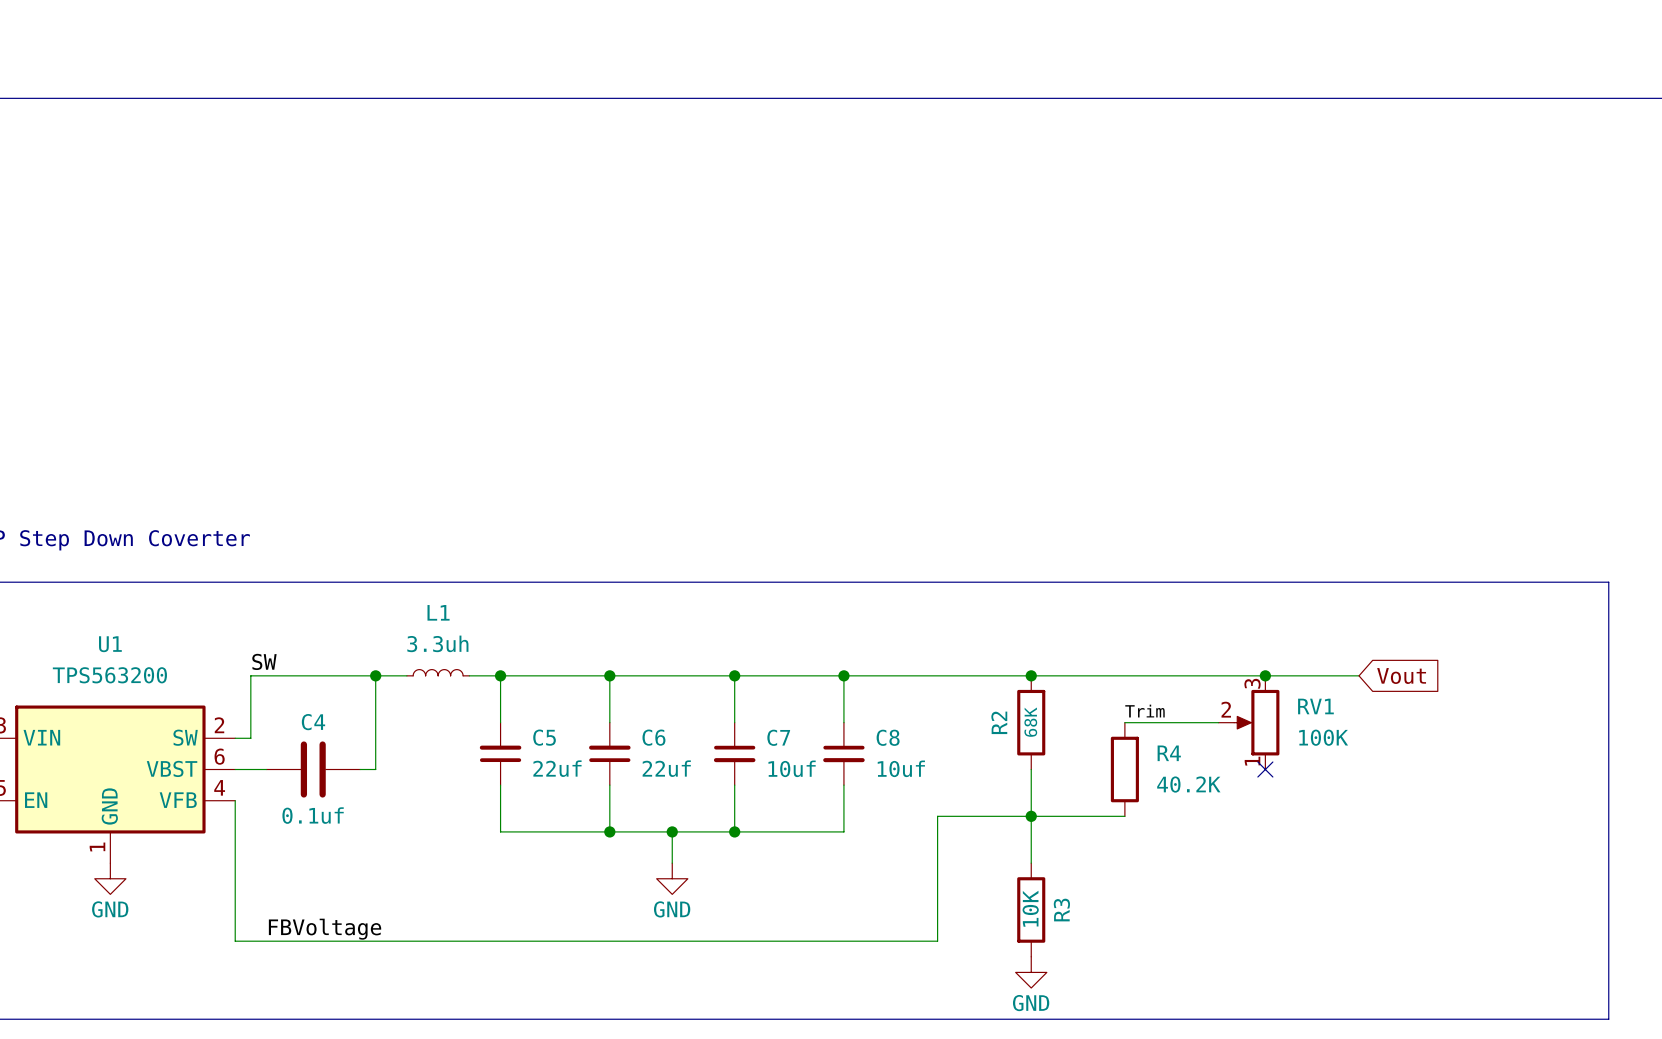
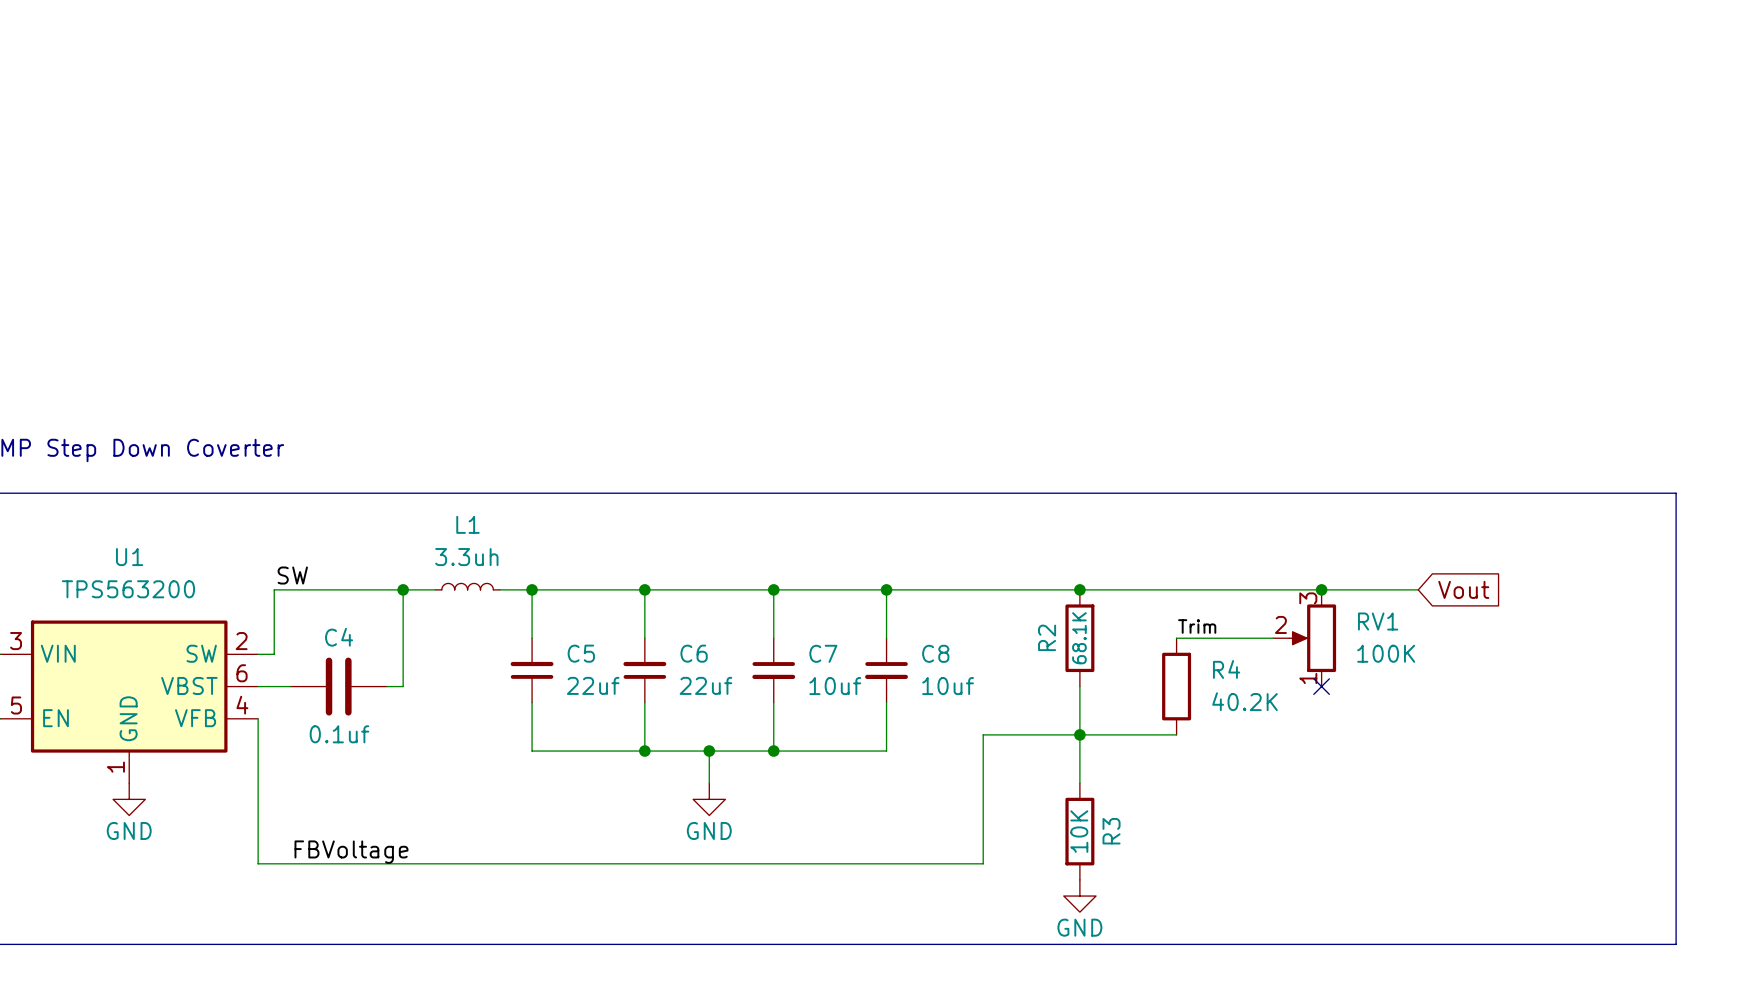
R2 value: 68K (1030, 722) -> 68.1K (1079, 638)

